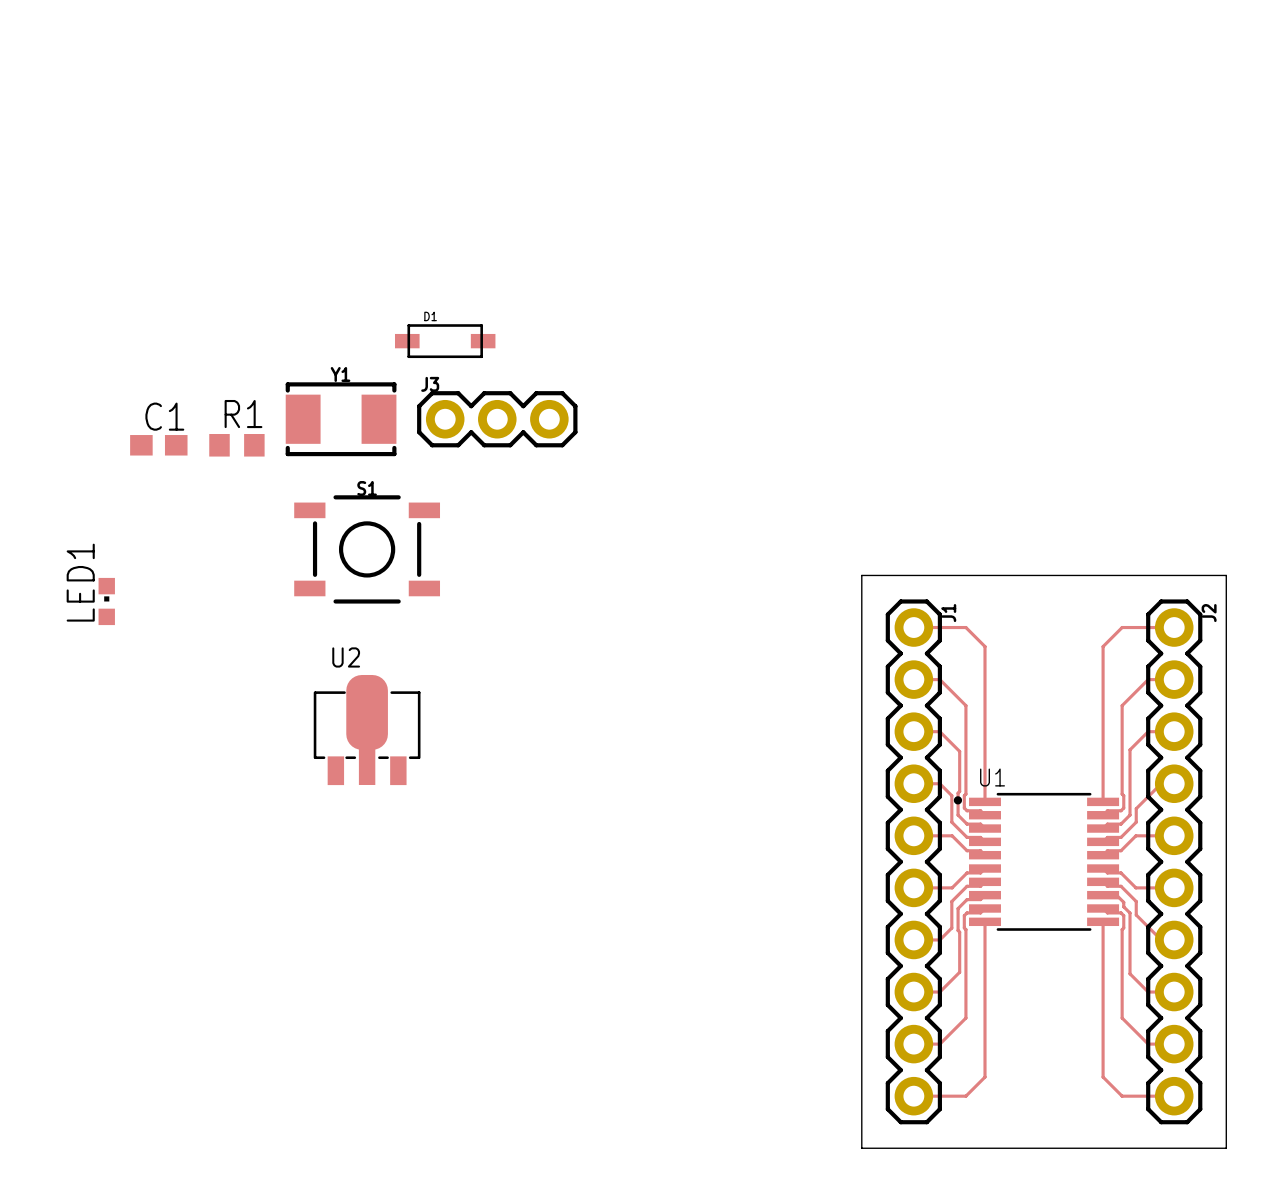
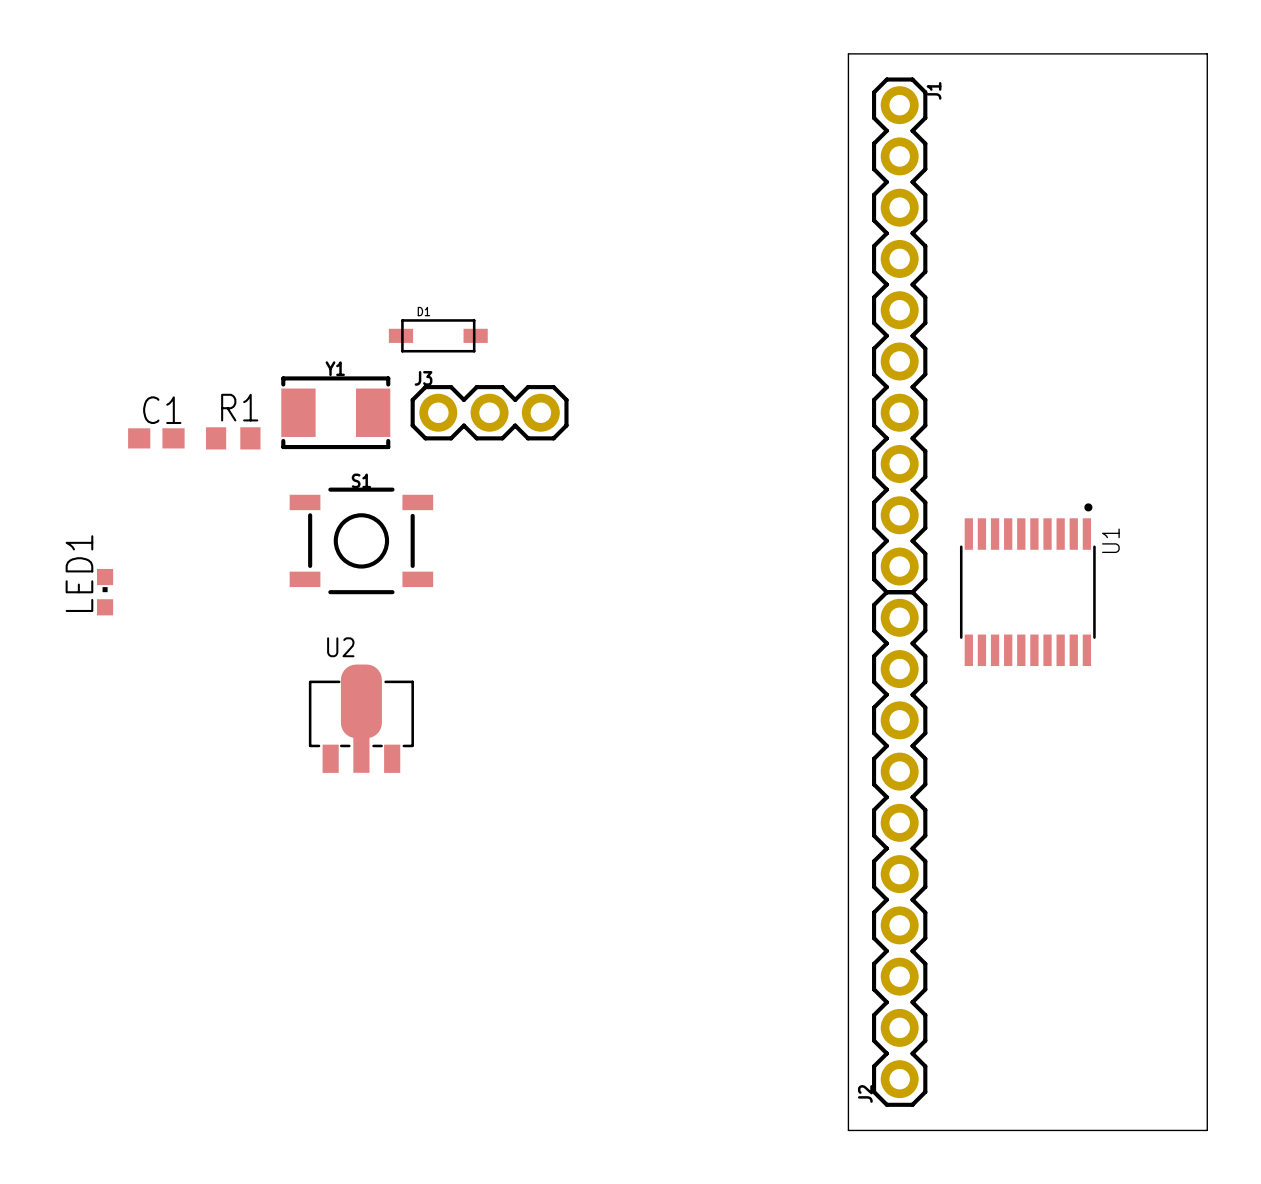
J1: none -> (899, 335)
board edge: (861, 575) (1226, 575) -> (848, 566) (848, 53) (1207, 53) (1207, 566)
J1 name: J1 (948, 613) -> J2 (865, 1093)
top track: (913, 627) (965, 627) (985, 646) (985, 801) -> none
top track: (1174, 627) (1122, 627) (1103, 646) (1103, 801) -> none
top track: (913, 679) (939, 679) (965, 705) (964, 808) (967, 810) (980, 810) (985, 815) -> none
top track: (1174, 679) (1148, 679) (1122, 705) (1123, 808) (1121, 810) (1107, 810) (1103, 815) -> none
top track: (913, 731) (939, 731) (959, 751) (958, 815) (967, 824) (980, 824) (985, 828) -> none
top track: (1174, 731) (1148, 731) (1130, 749) (1130, 815) (1121, 824) (1107, 824) (1103, 828) -> none
top track: (913, 783) (939, 783) (951, 795) (951, 822) (967, 837) (980, 837) (985, 841) -> none
top track: (1174, 783) (1161, 783) (1136, 808) (1136, 822) (1121, 837) (1107, 837) (1103, 841) -> none
top track: (913, 835) (952, 835) (967, 850) (980, 850) (985, 855) -> none
top track: (1174, 835) (1135, 835) (1121, 850) (1107, 850) (1103, 855) -> none
U1 rotation: 0° (1036, 861) -> 90° clockwise (1027, 584)
U1 position: (1036, 861) -> (1027, 584)
J2: (1174, 861) -> none
top track: (985, 868) (980, 872) (967, 872) (952, 887) (913, 887) -> none
top track: (1103, 868) (1107, 872) (1121, 872) (1135, 887) (1174, 887) -> none
top track: (985, 881) (980, 886) (967, 886) (951, 901) (951, 928) (939, 939) (913, 939) -> none
top track: (1103, 881) (1107, 886) (1121, 886) (1136, 901) (1136, 915) (1161, 939) (1174, 939) -> none
top track: (985, 895) (980, 899) (967, 899) (958, 908) (959, 972) (939, 992) (913, 992) -> none
top track: (1103, 895) (1116, 895) (1130, 913) (1130, 973) (1148, 992) (1174, 992) -> none
top track: (985, 908) (980, 912) (967, 912) (964, 915) (965, 1018) (939, 1044) (913, 1044) -> none
top track: (1103, 908) (1107, 912) (1121, 912) (1123, 915) (1122, 1018) (1148, 1044) (1174, 1044) -> none
top track: (985, 921) (985, 1077) (965, 1096) (913, 1096) -> none
top track: (1103, 921) (1103, 1077) (1122, 1096) (1174, 1096) -> none

